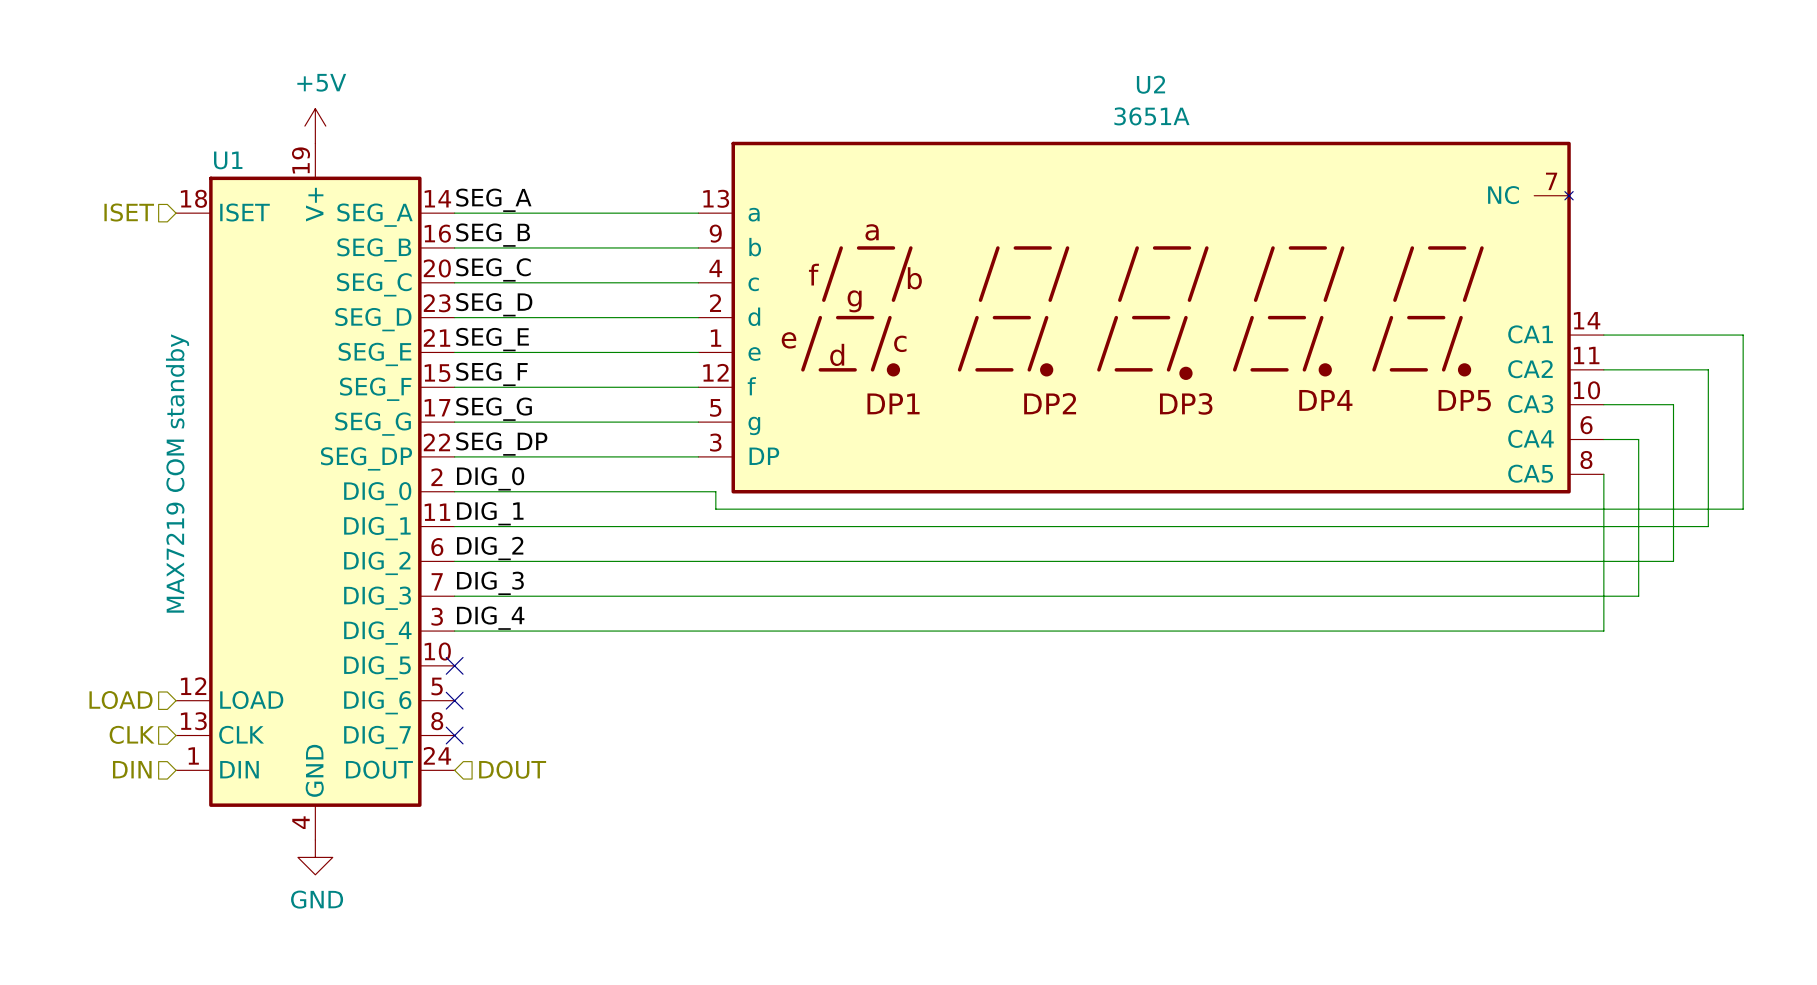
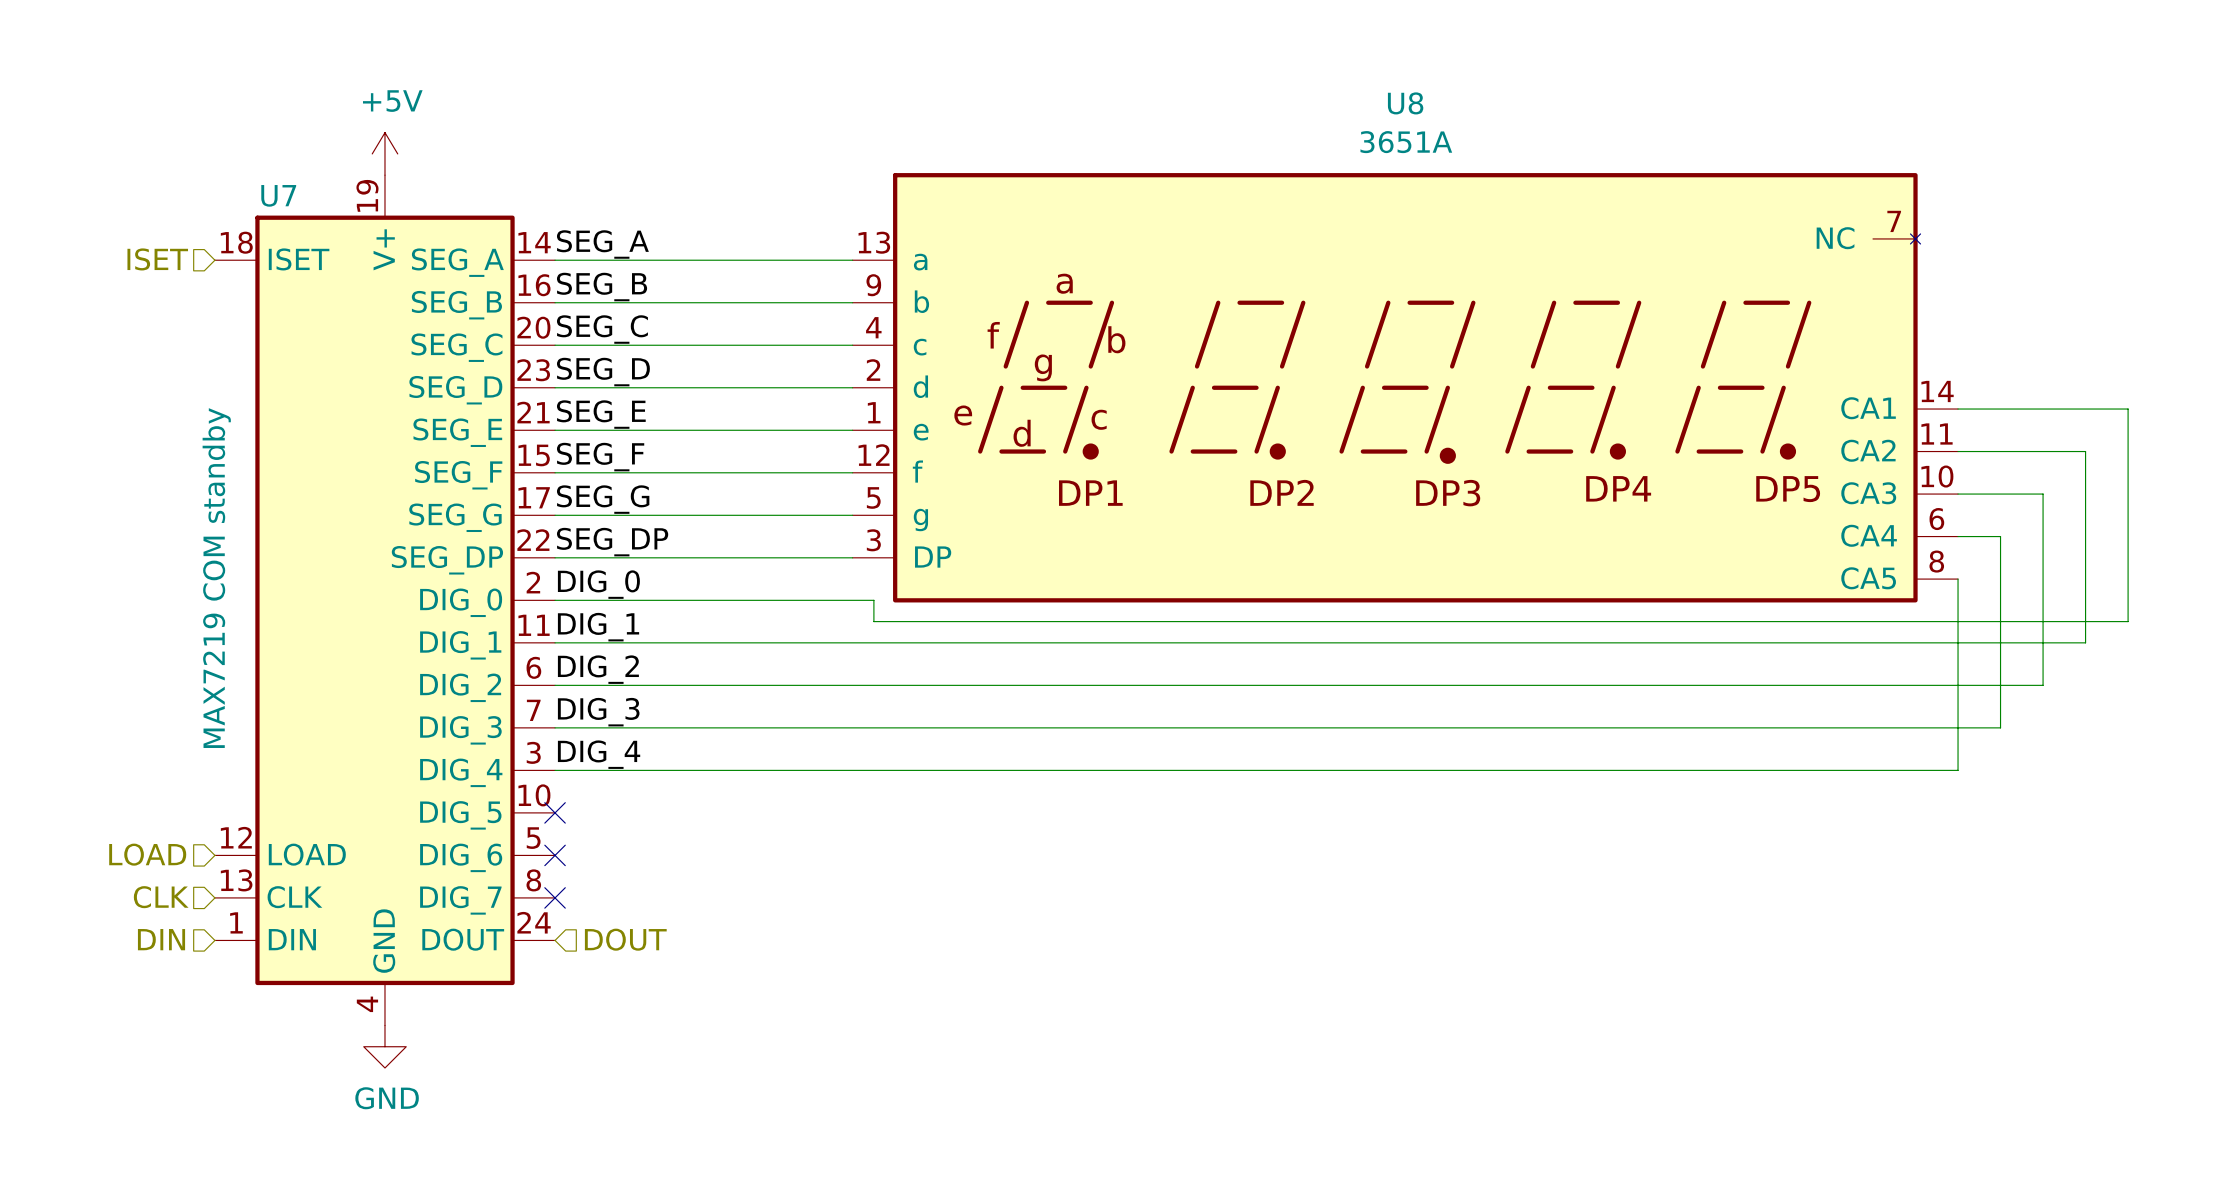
U2 name: U2 (1150, 84) -> U8 (1405, 103)
U1 name: U1 (228, 160) -> U7 (278, 195)

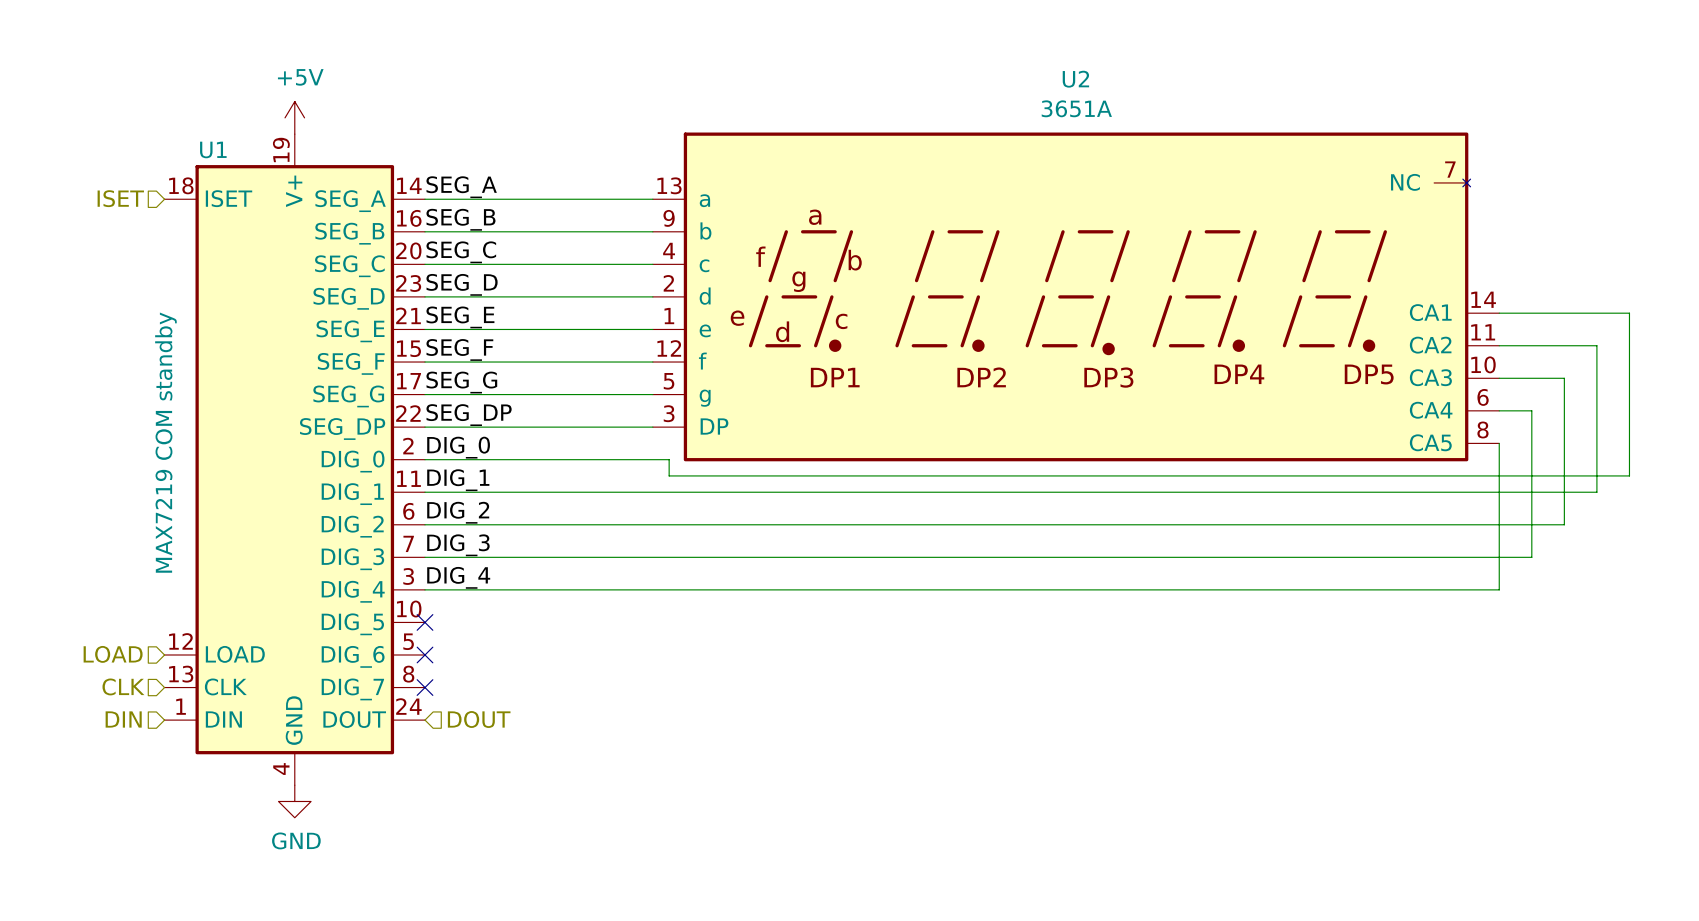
U8 name: U8 (1405, 103) -> U2 (1075, 79)
U7 name: U7 (278, 195) -> U1 (213, 149)

